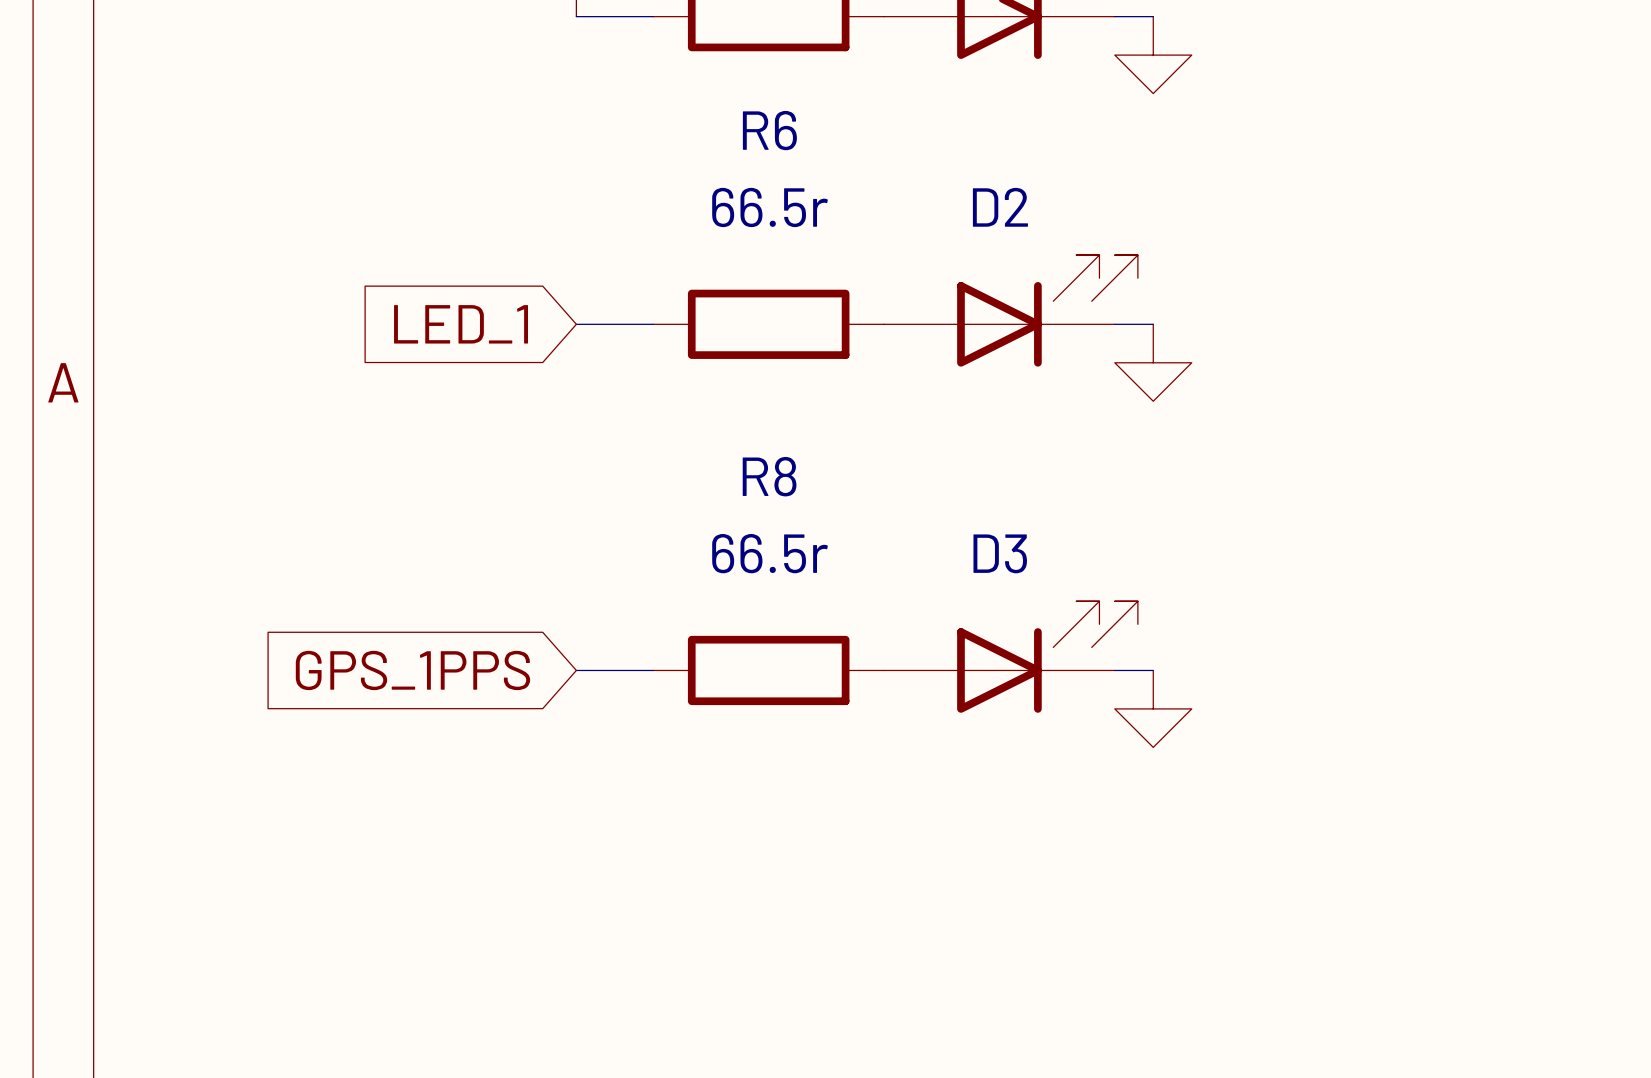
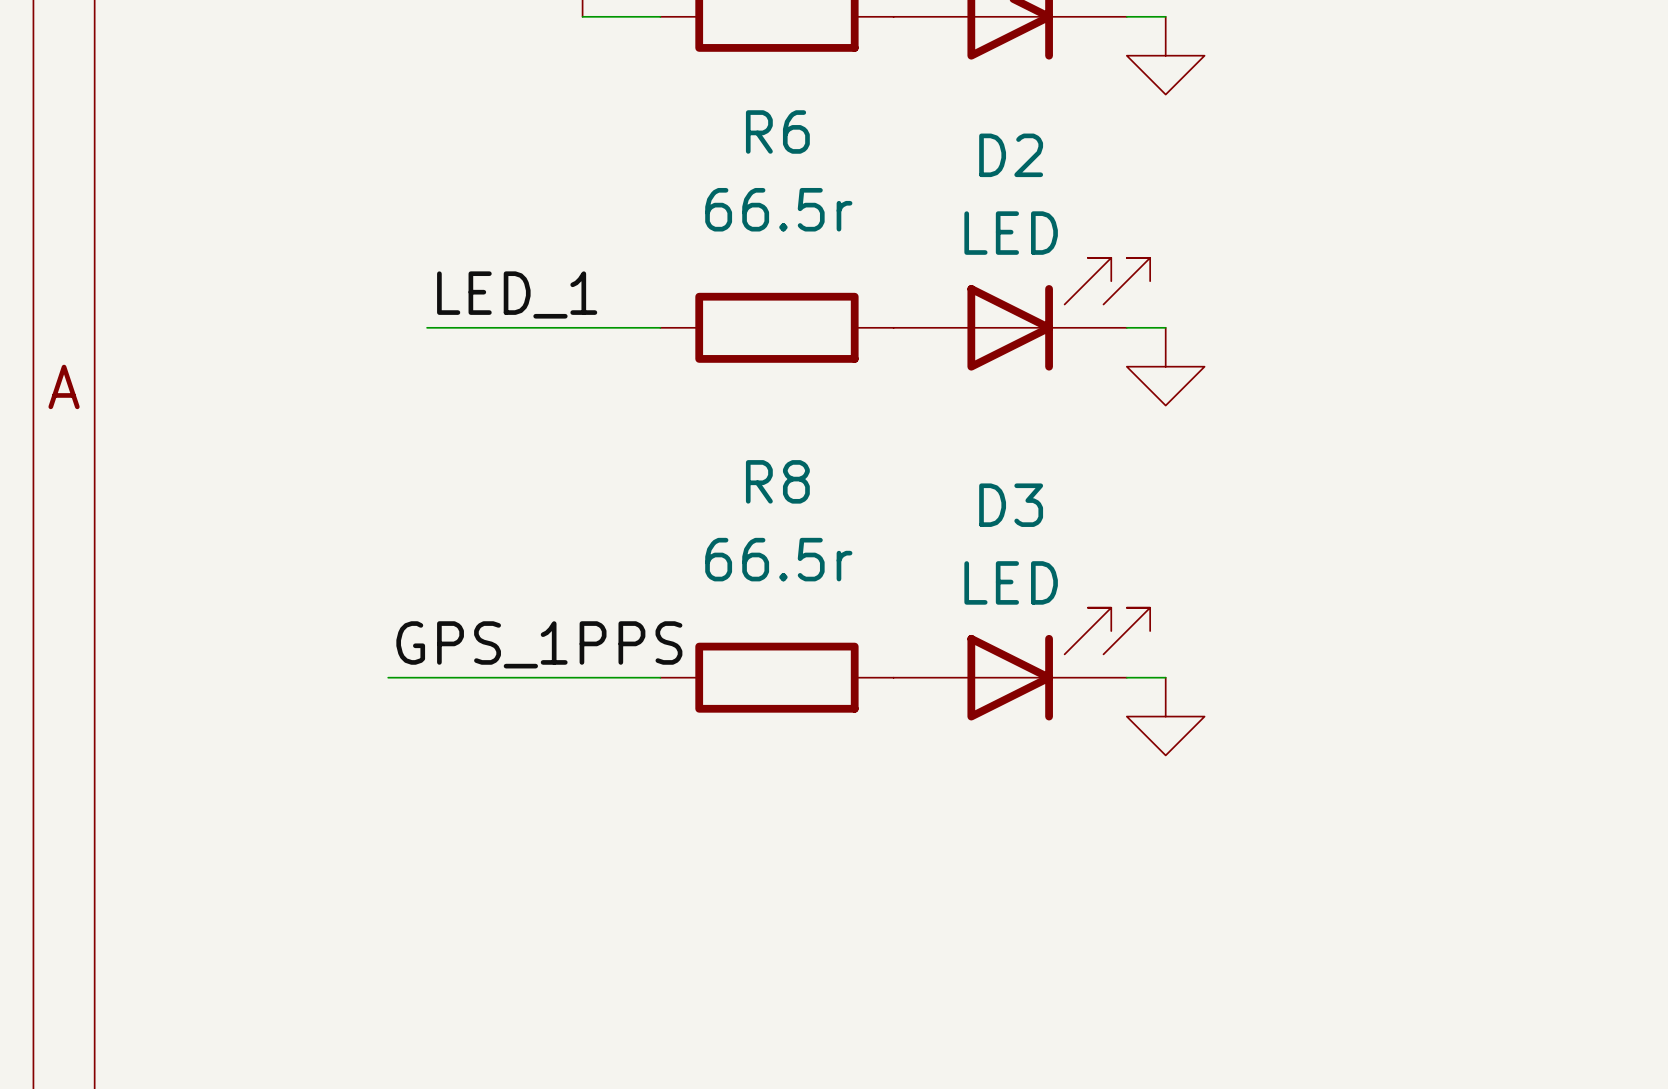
D2 name position: D2 (1000, 207) -> D2 (1011, 155)
D2 value: none -> LED (1011, 233)
label: none -> LED_1 (517, 294)
wire: none -> (427, 327) (582, 327)
global label: LED_1 (461, 324) -> none
D3 name position: D3 (1000, 553) -> D3 (1011, 505)
D3 value: none -> LED (1011, 582)
label: none -> GPS_1PPS (539, 644)
wire: none -> (388, 677) (582, 677)
global label: GPS_1PPS (412, 670) -> none

